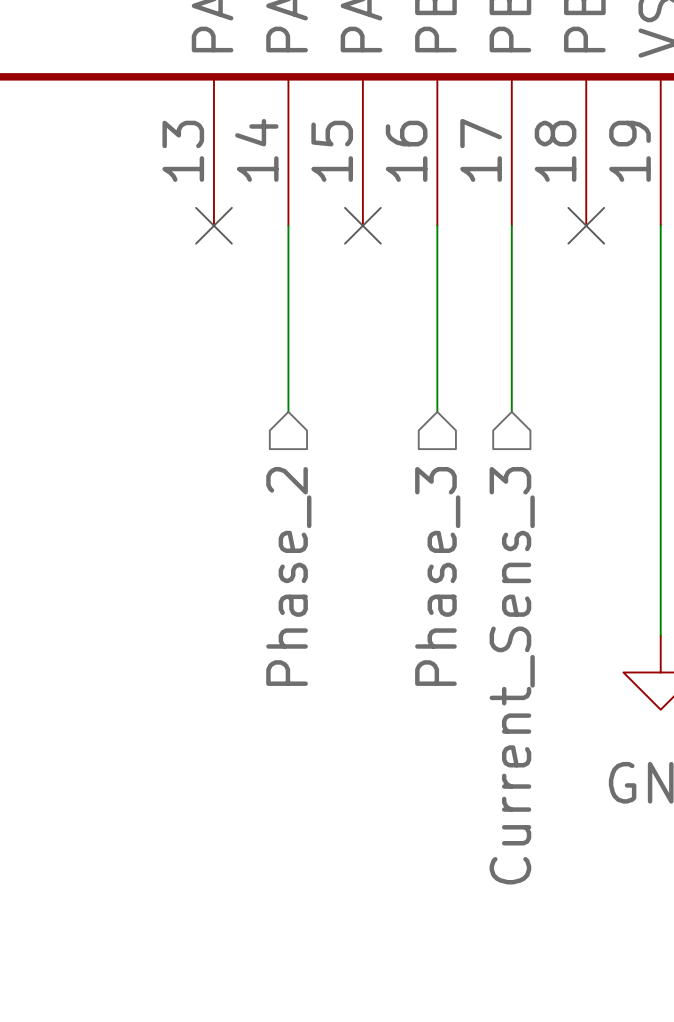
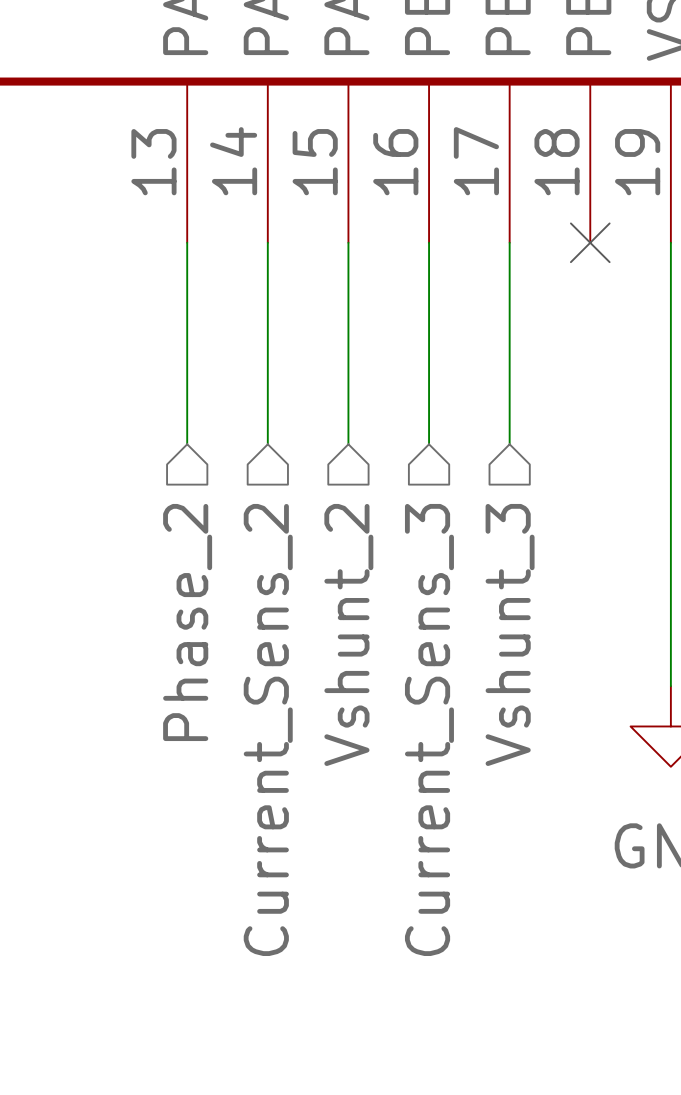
wire: none -> (187, 242) (187, 444)
no-connect mark: (213, 225) -> none
wire: none -> (348, 242) (348, 444)
no-connect mark: (362, 225) -> none
hierarchical label: none -> Phase_2 (187, 622)
hierarchical label: Phase_2 (288, 576) -> Current_Sens_2 (268, 729)
hierarchical label: Phase_3 (437, 576) -> Current_Sens_3 (429, 729)
hierarchical label: none -> Vshunt_2 (348, 634)
hierarchical label: Current_Sens_3 (512, 675) -> Vshunt_3 (510, 634)

